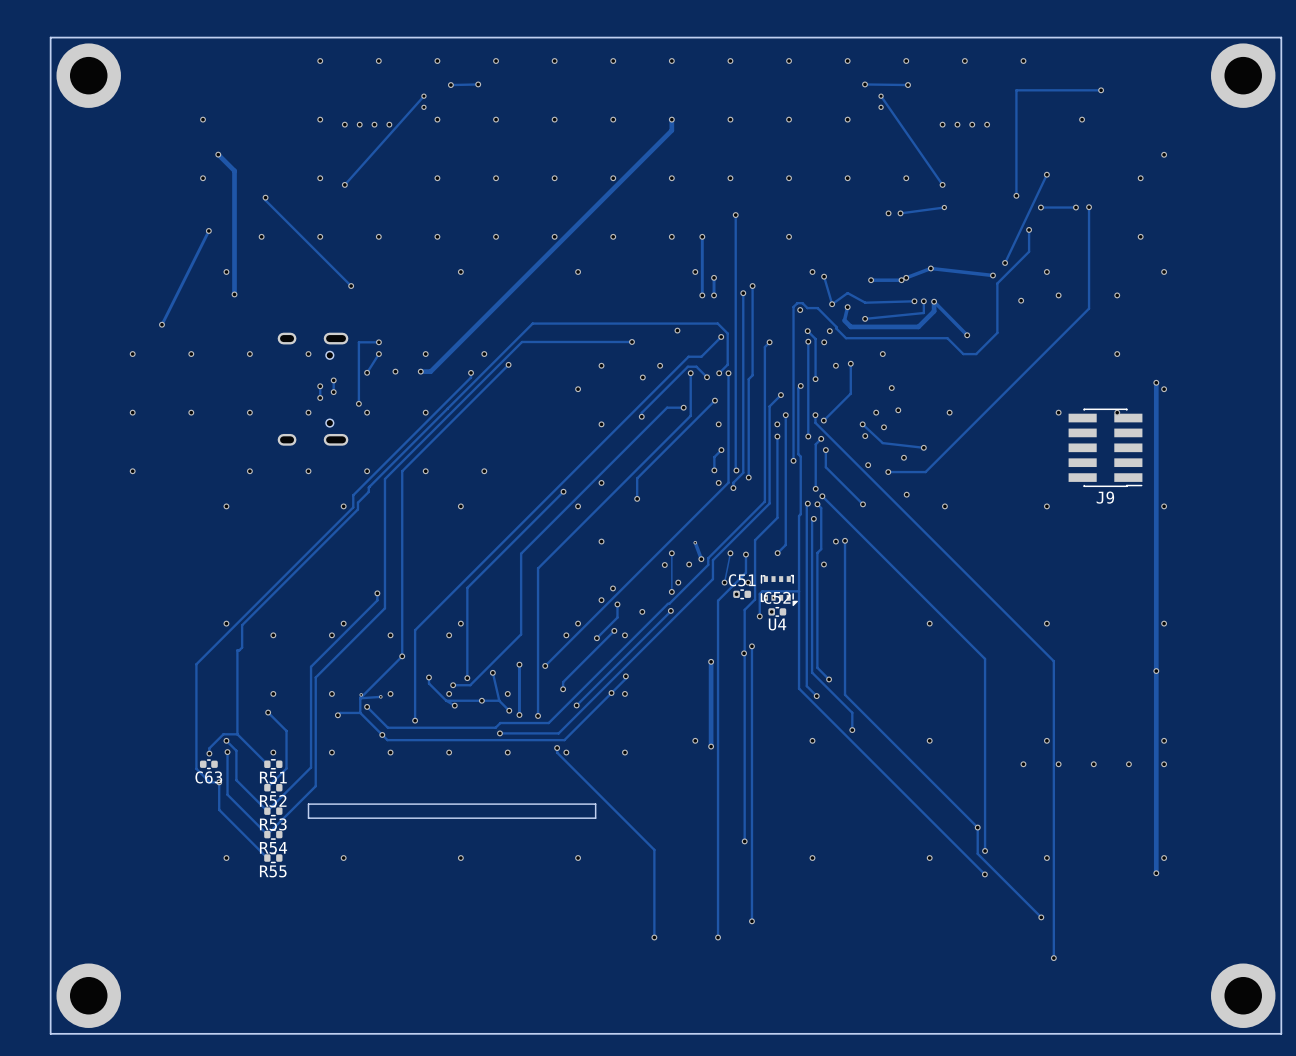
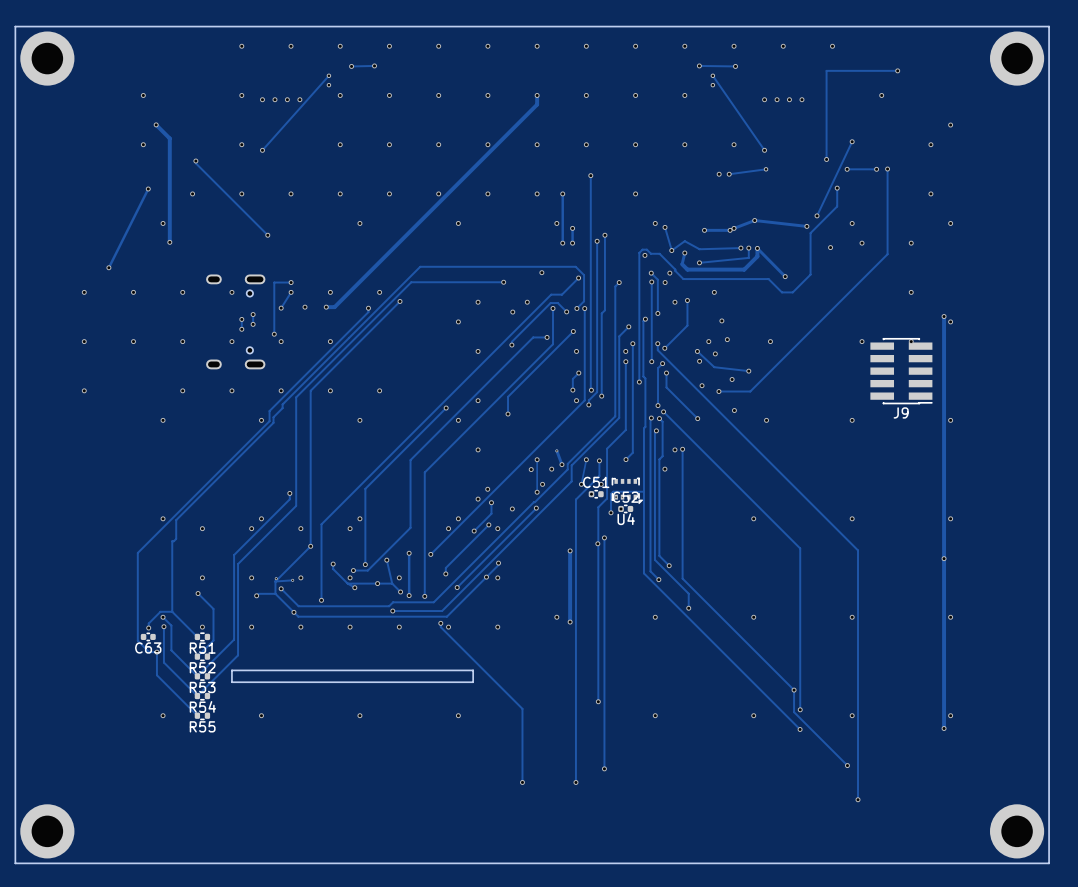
via: (1023, 764) -> none
via: (1058, 764) -> none
via: (1093, 764) -> none
via: (1128, 764) -> none
via: (1164, 764) -> none

